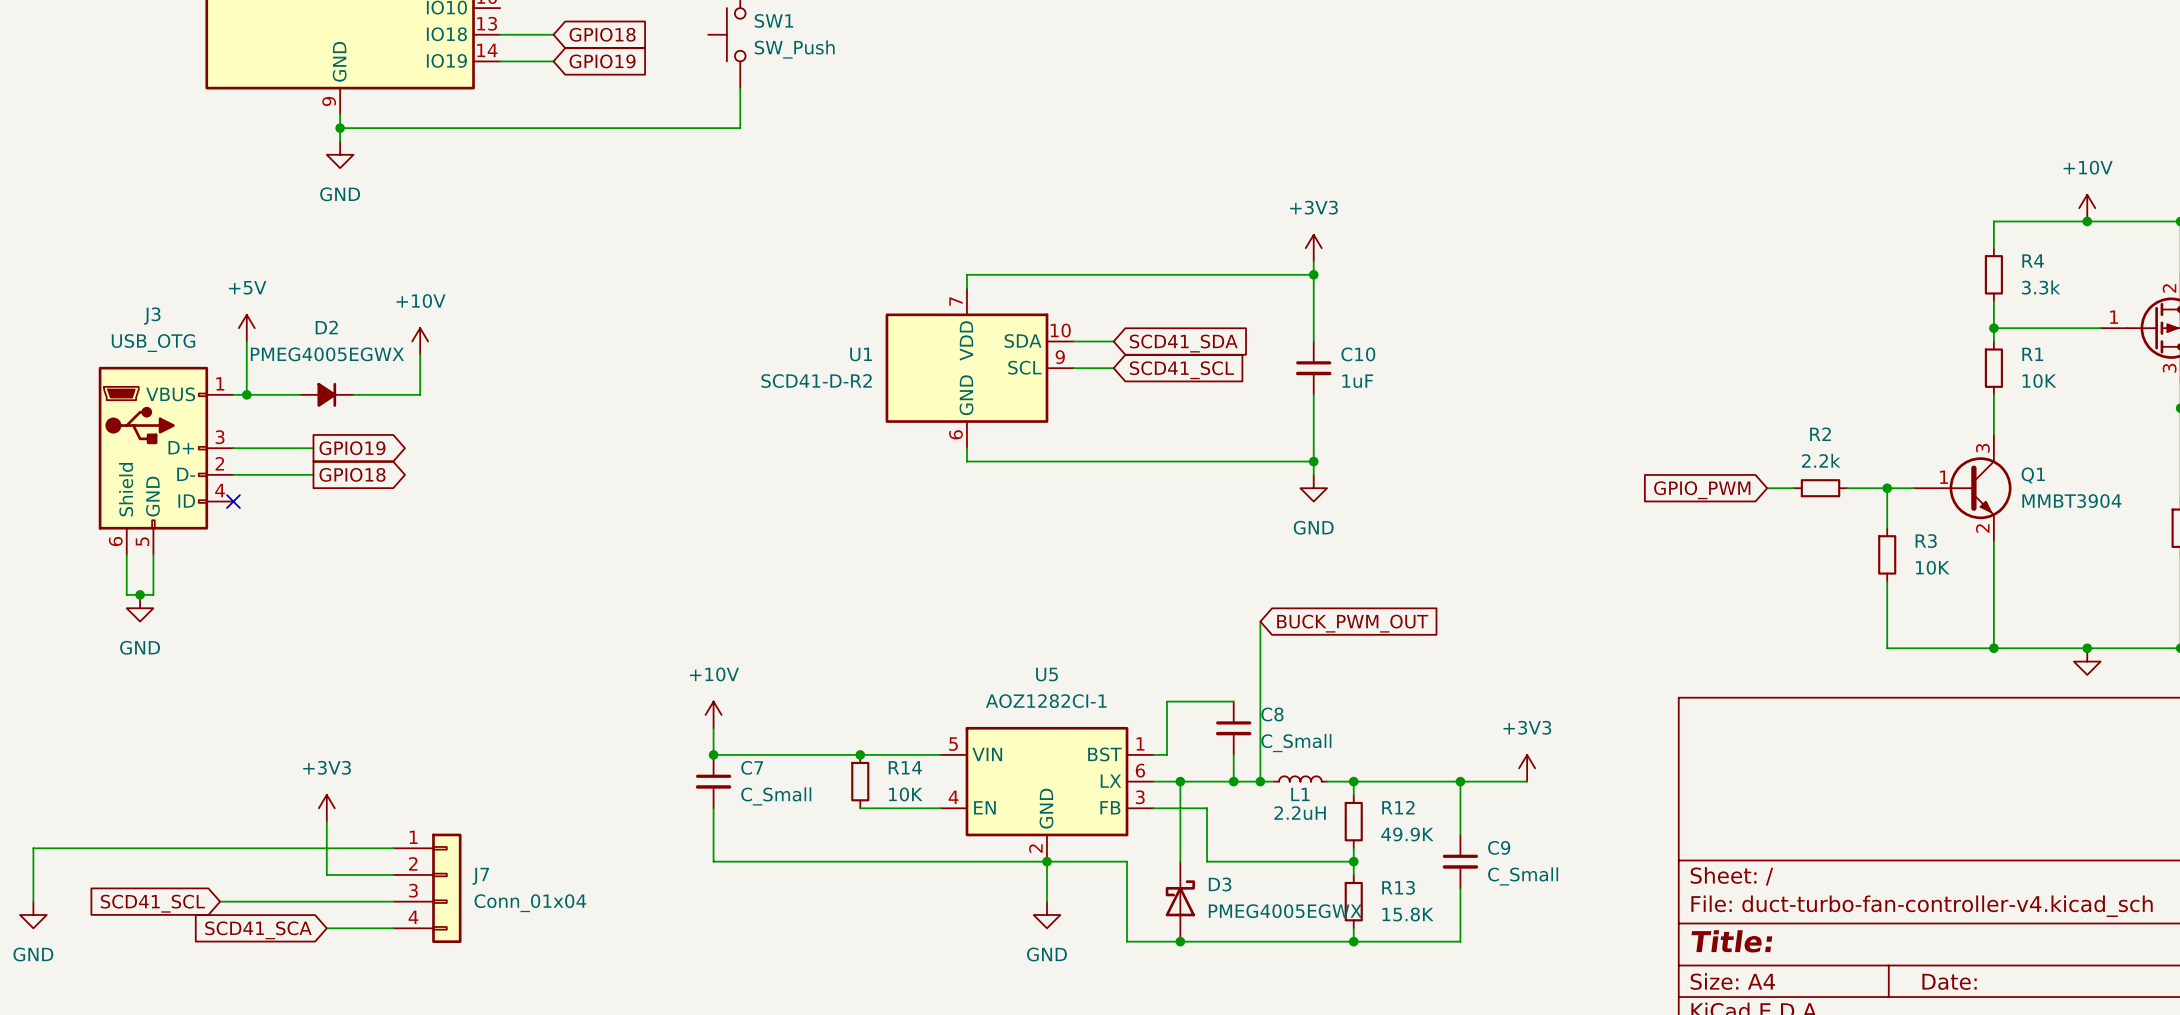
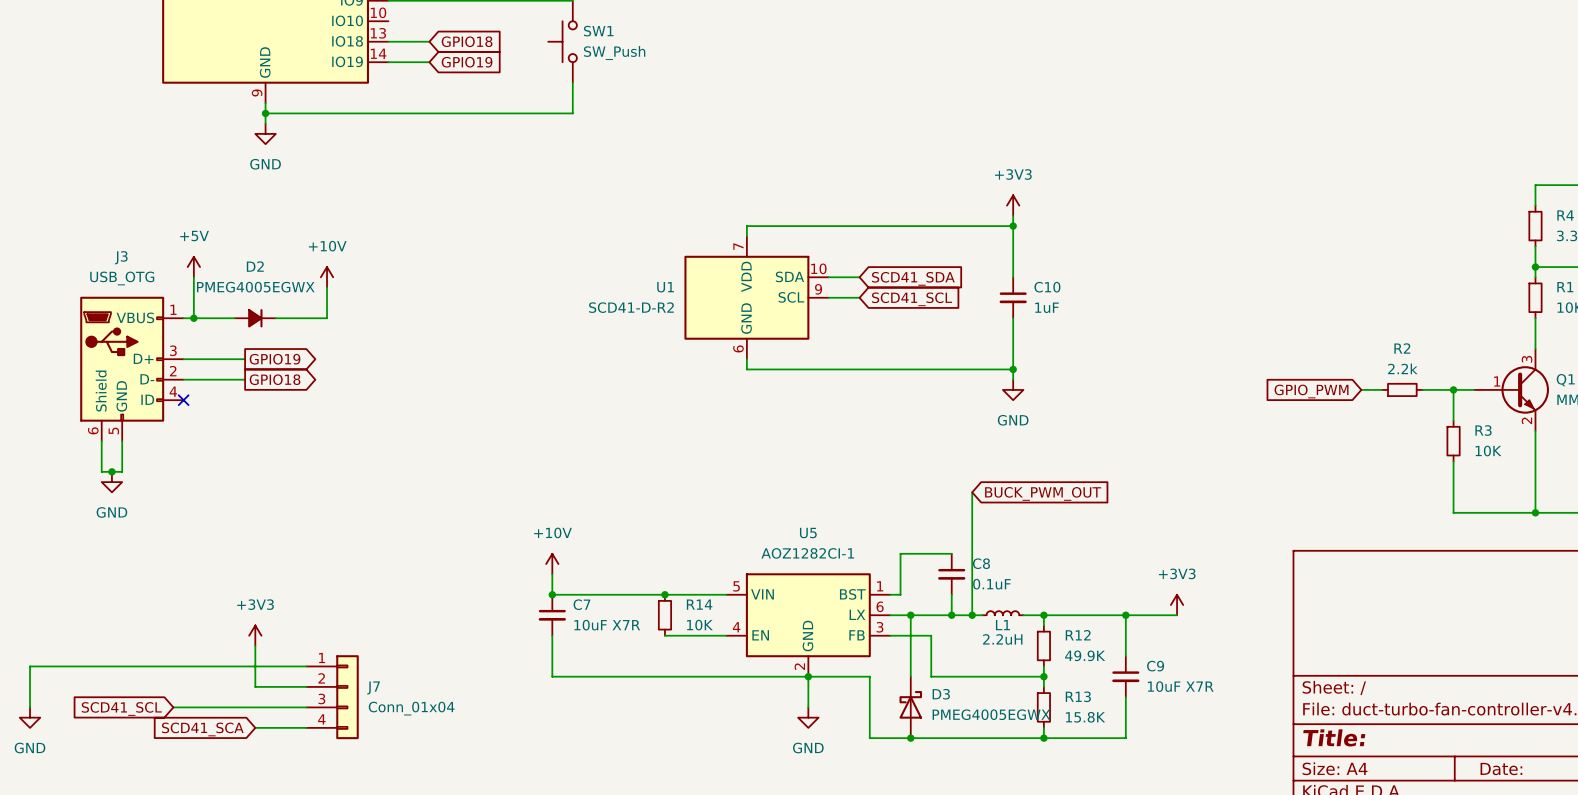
C8 value: C_Small (1296, 743) -> 0.1uF (991, 584)
C7 value: C_Small (776, 796) -> 10uF X7R (607, 625)
C9 value: C_Small (1523, 876) -> 10uF X7R (1180, 686)

